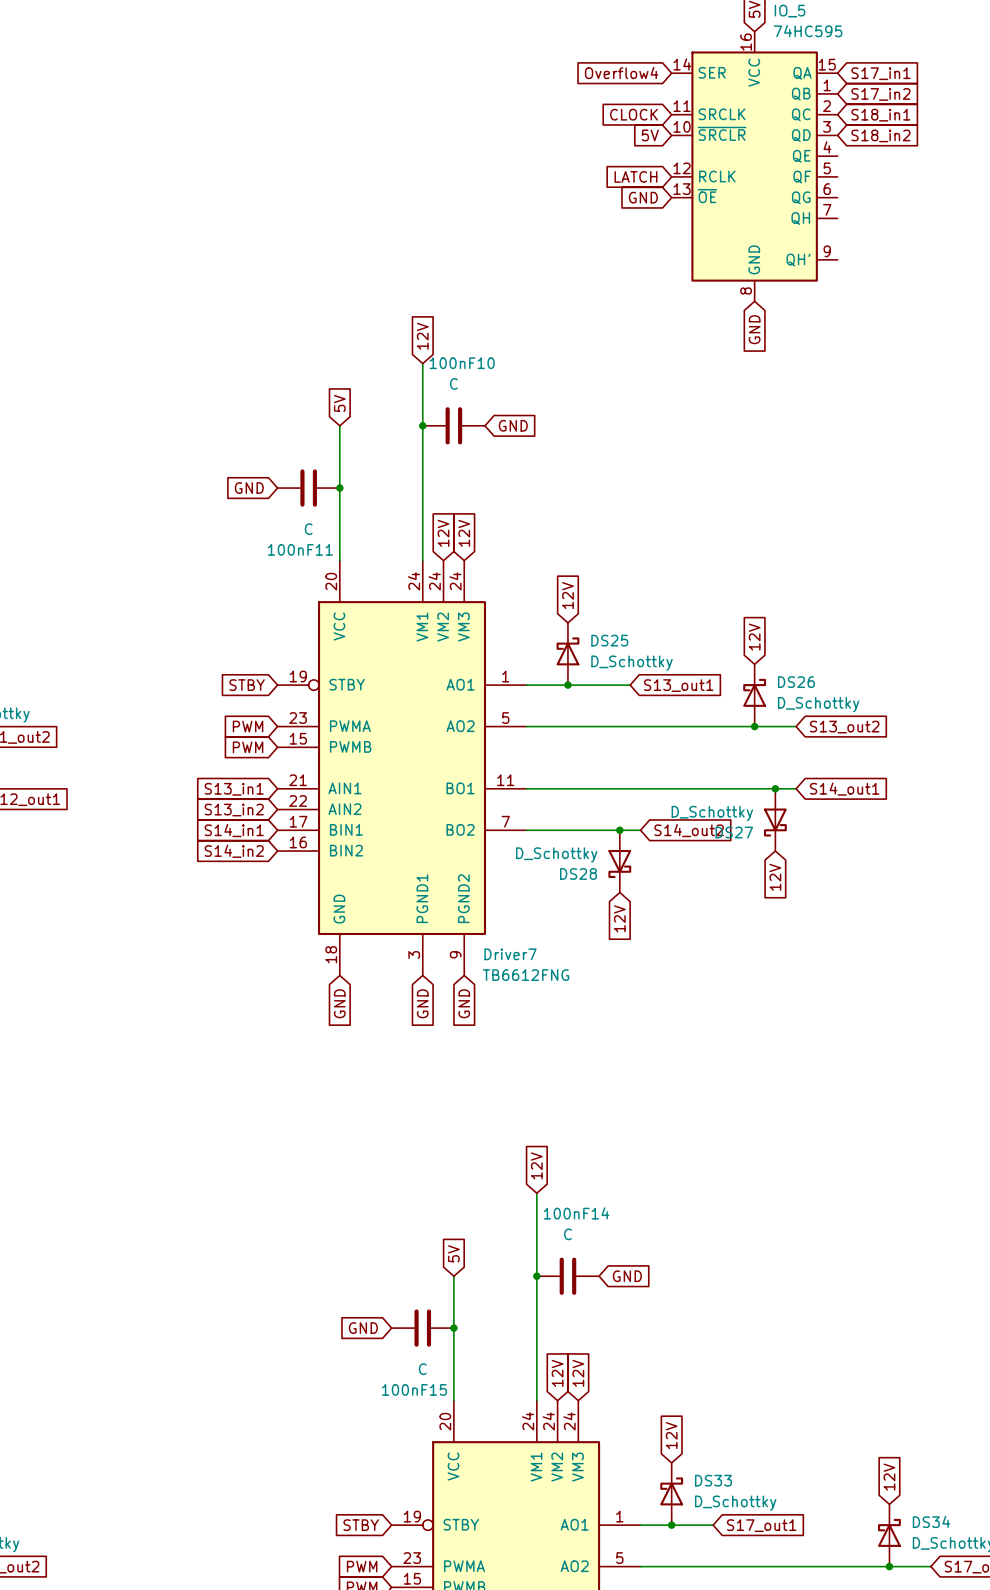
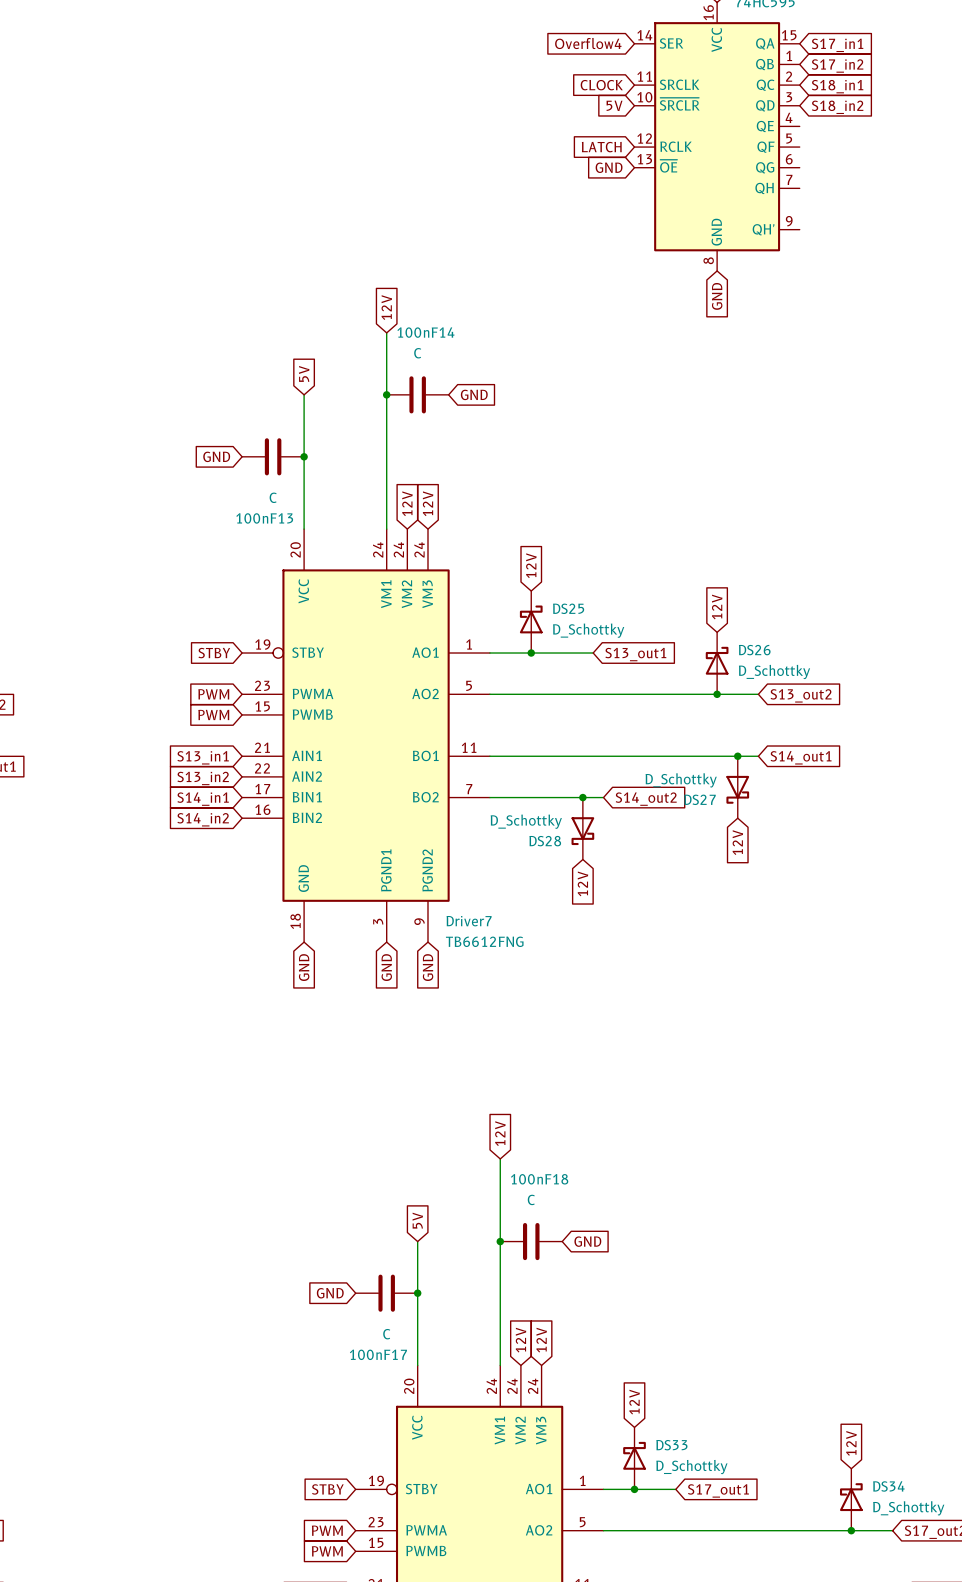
100nF10 name: 100nF10 (462, 363) -> 100nF14 (425, 332)
100nF11 name: 100nF11 (300, 549) -> 100nF13 (264, 518)
100nF14 name: 100nF14 (576, 1213) -> 100nF18 (539, 1179)
100nF15 name: 100nF15 (414, 1389) -> 100nF17 (378, 1354)

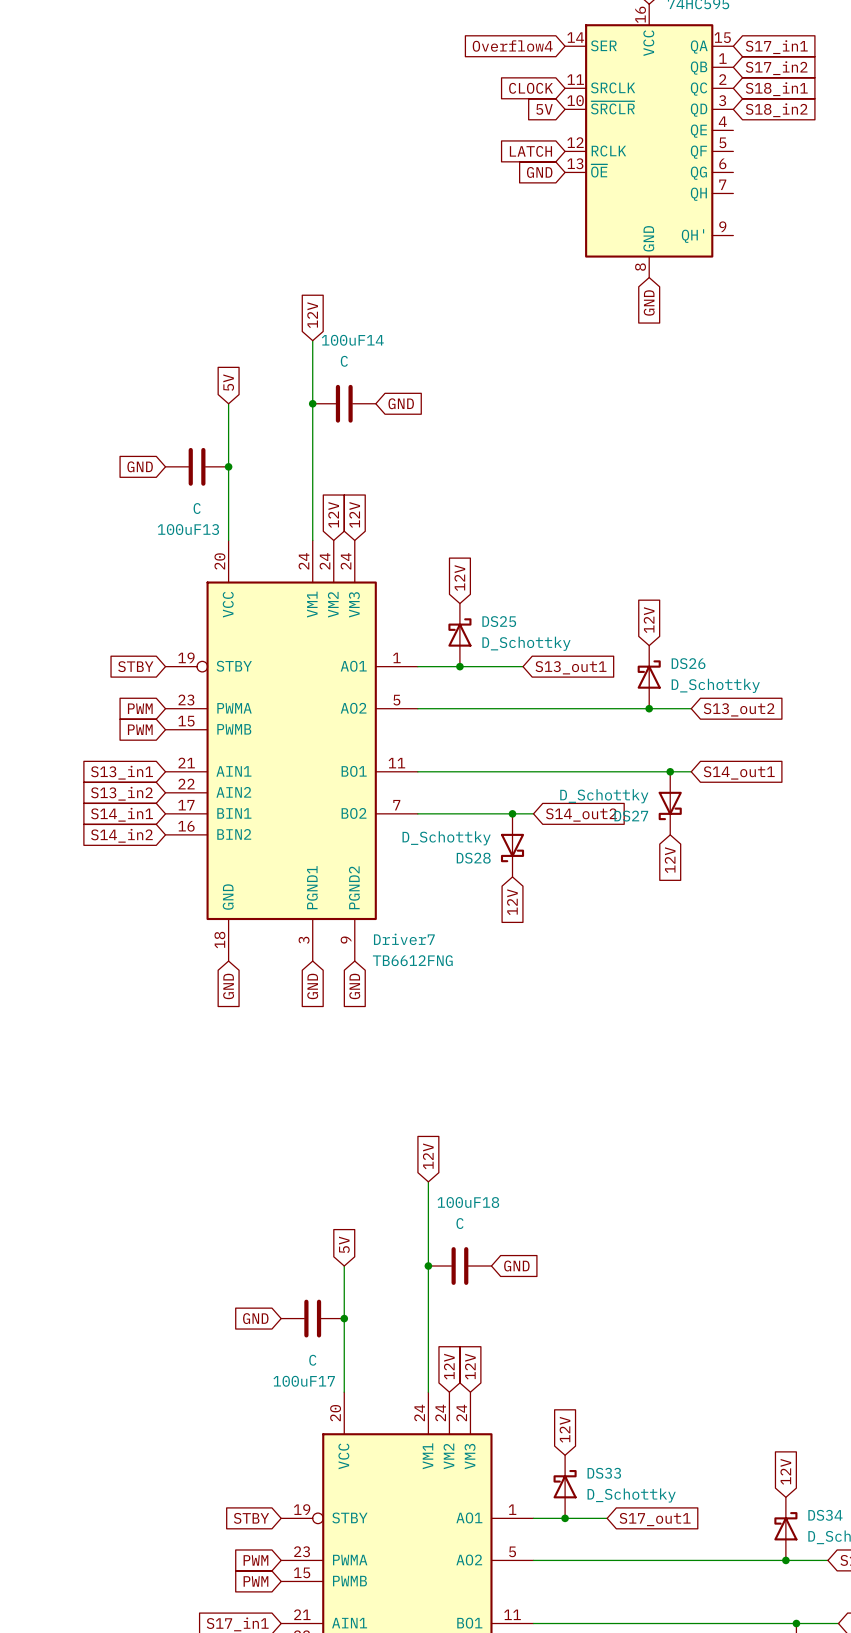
100nF14 name: 100nF14 (425, 332) -> 100uF14 (352, 340)
100nF13 name: 100nF13 (264, 518) -> 100uF13 (188, 529)
100nF18 name: 100nF18 (539, 1179) -> 100uF18 (468, 1202)
100nF17 name: 100nF17 (378, 1354) -> 100uF17 (304, 1381)

